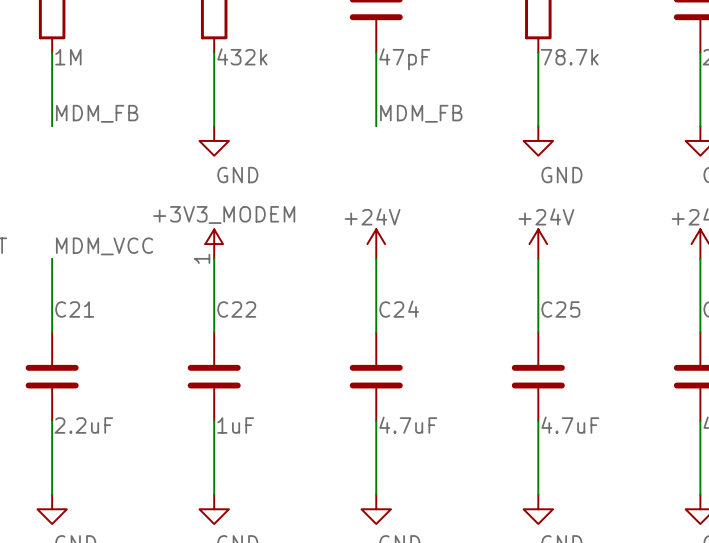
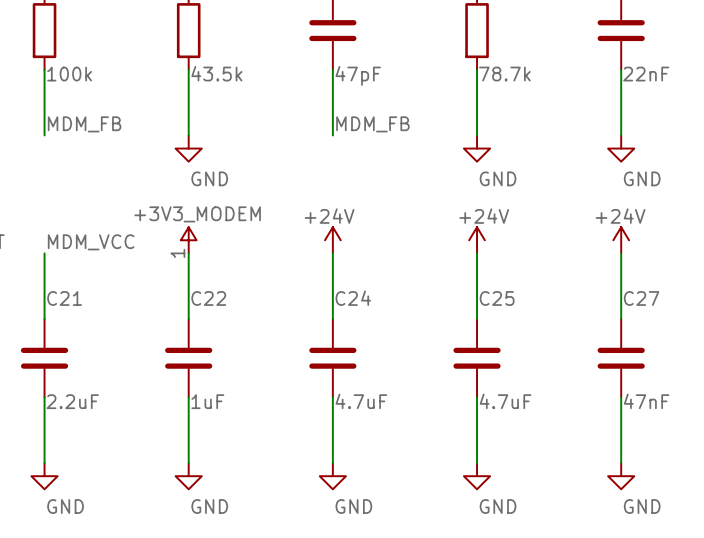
part value: 432k (242, 56) -> 43.5k (216, 73)
part value: 1M (68, 57) -> 100k (69, 74)

